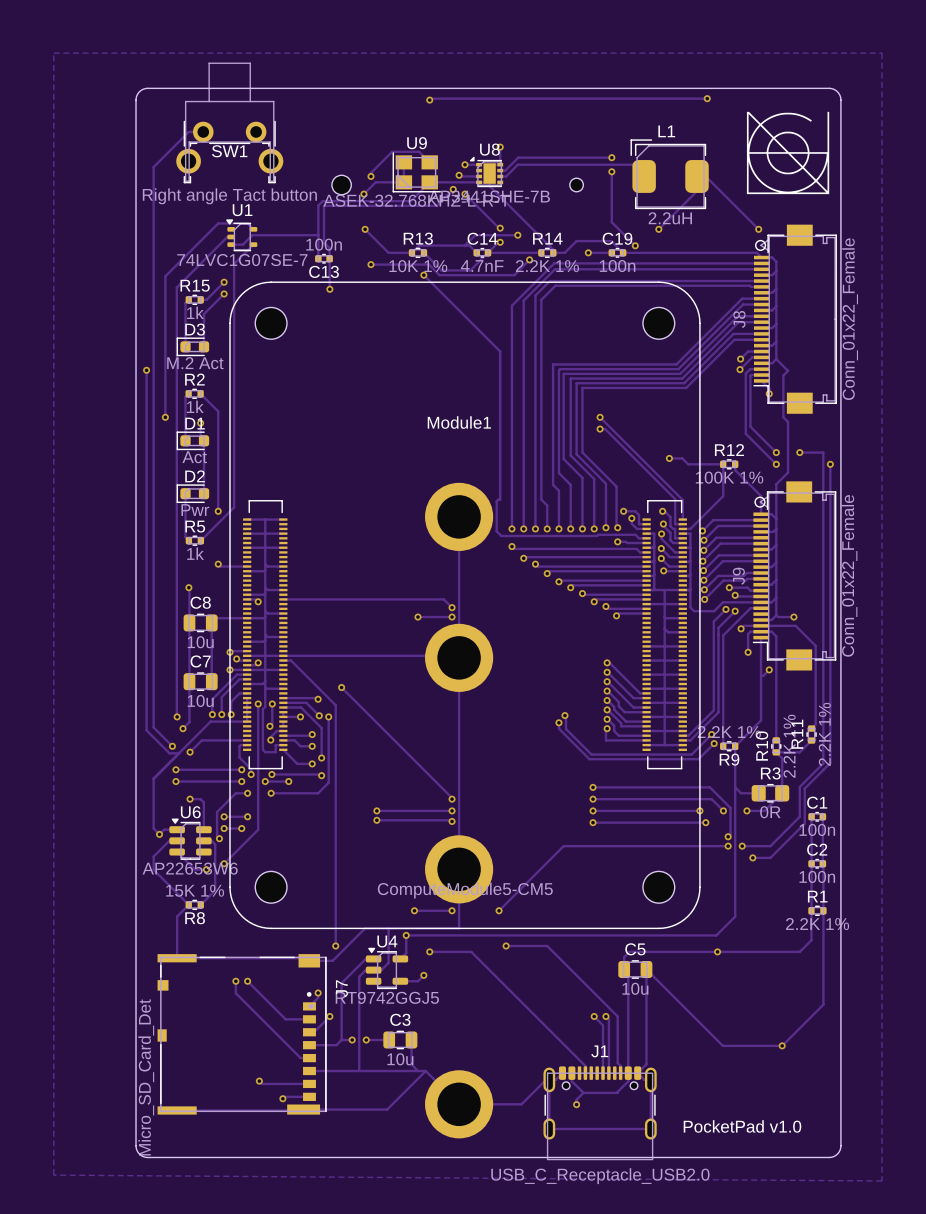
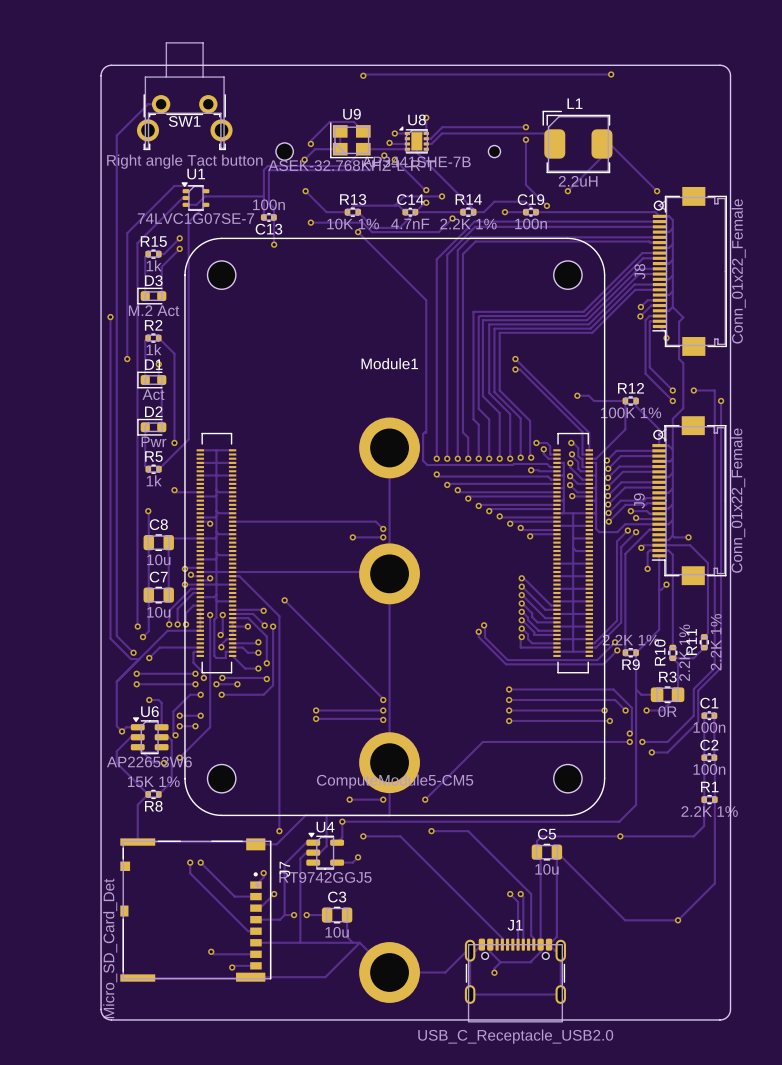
zone outline: (53, 53) (882, 53) (882, 1180) (53, 1175) (53, 53) -> none
drawing: [746, 111, 830, 195] -> none
text: PocketPad v1.0 (742, 1126) -> none

